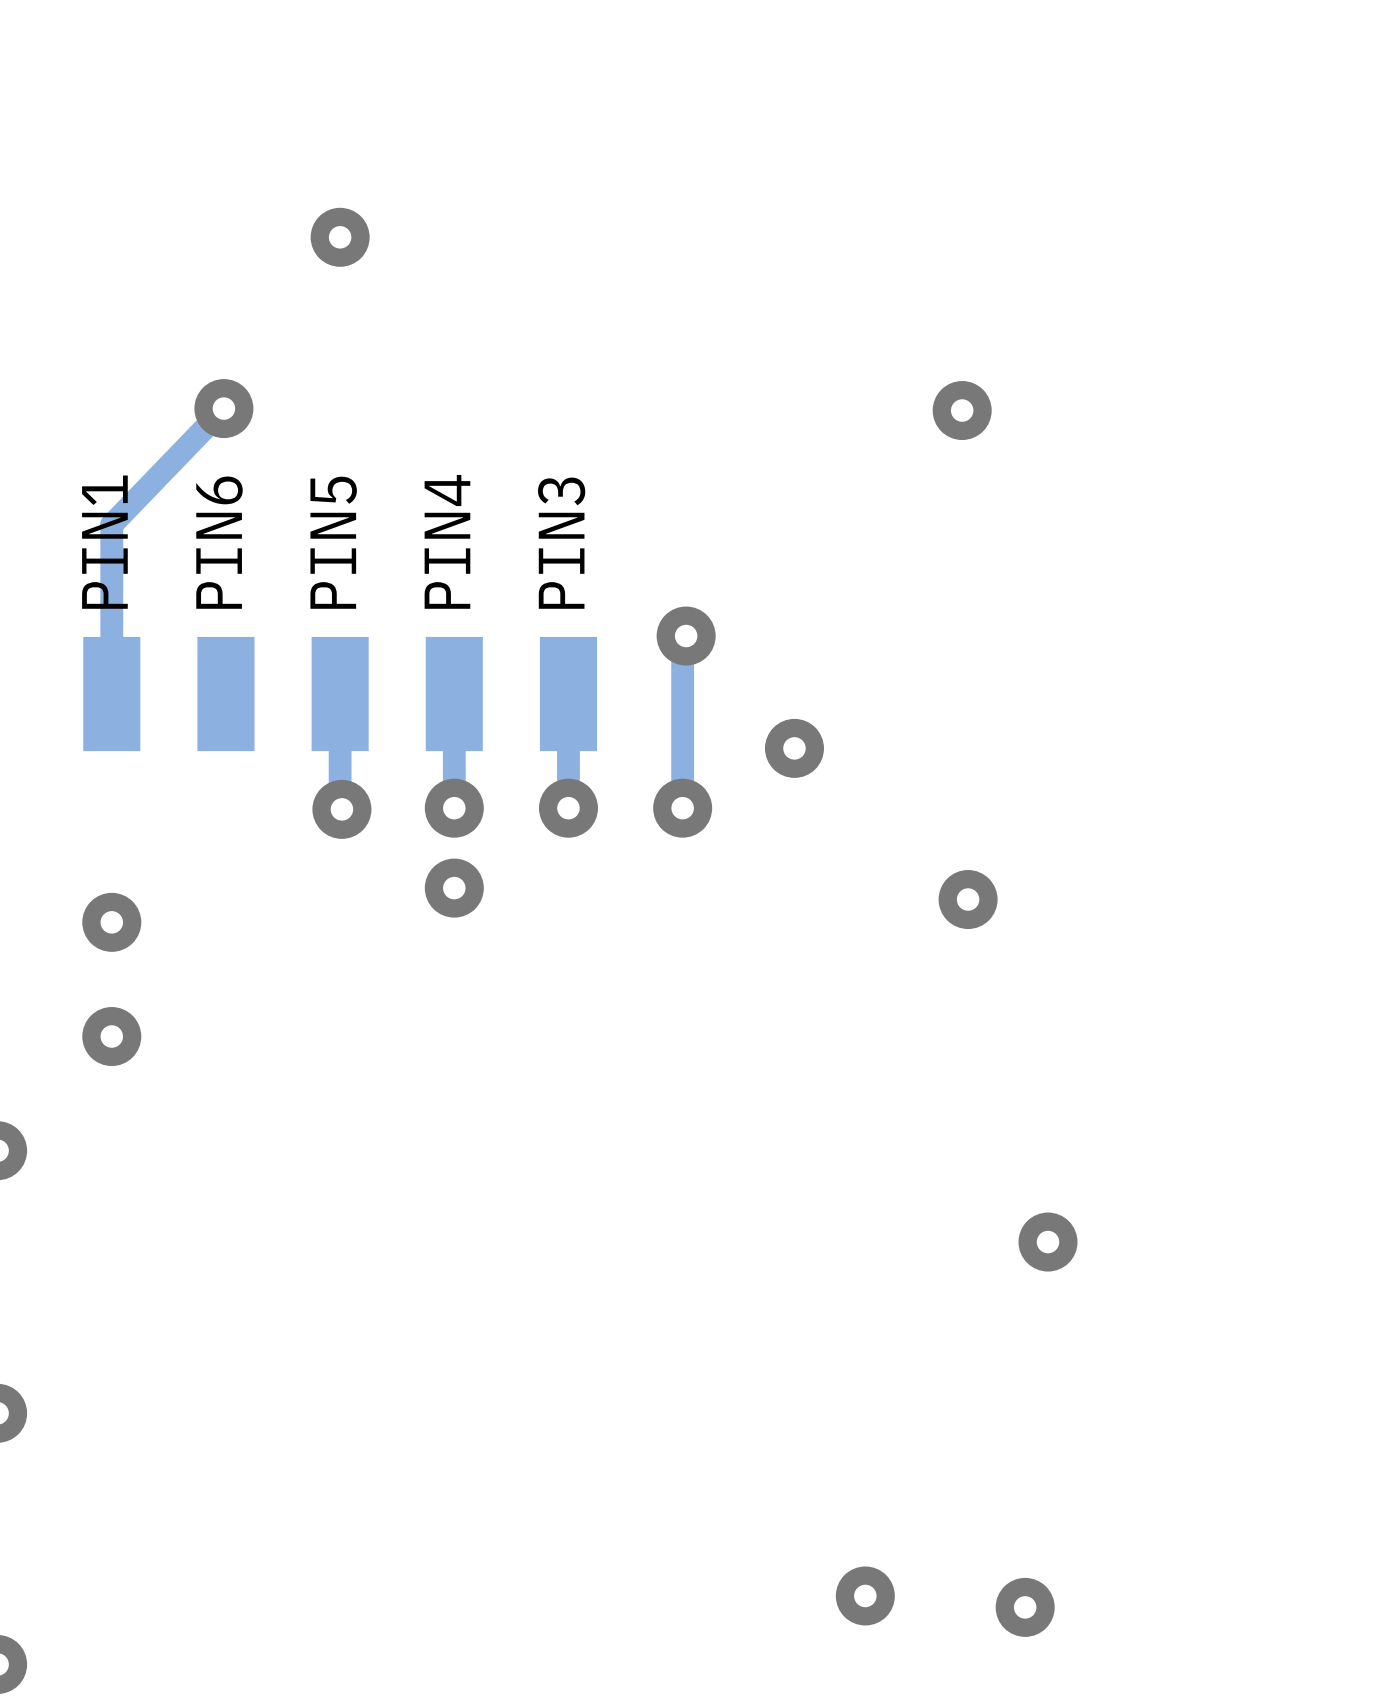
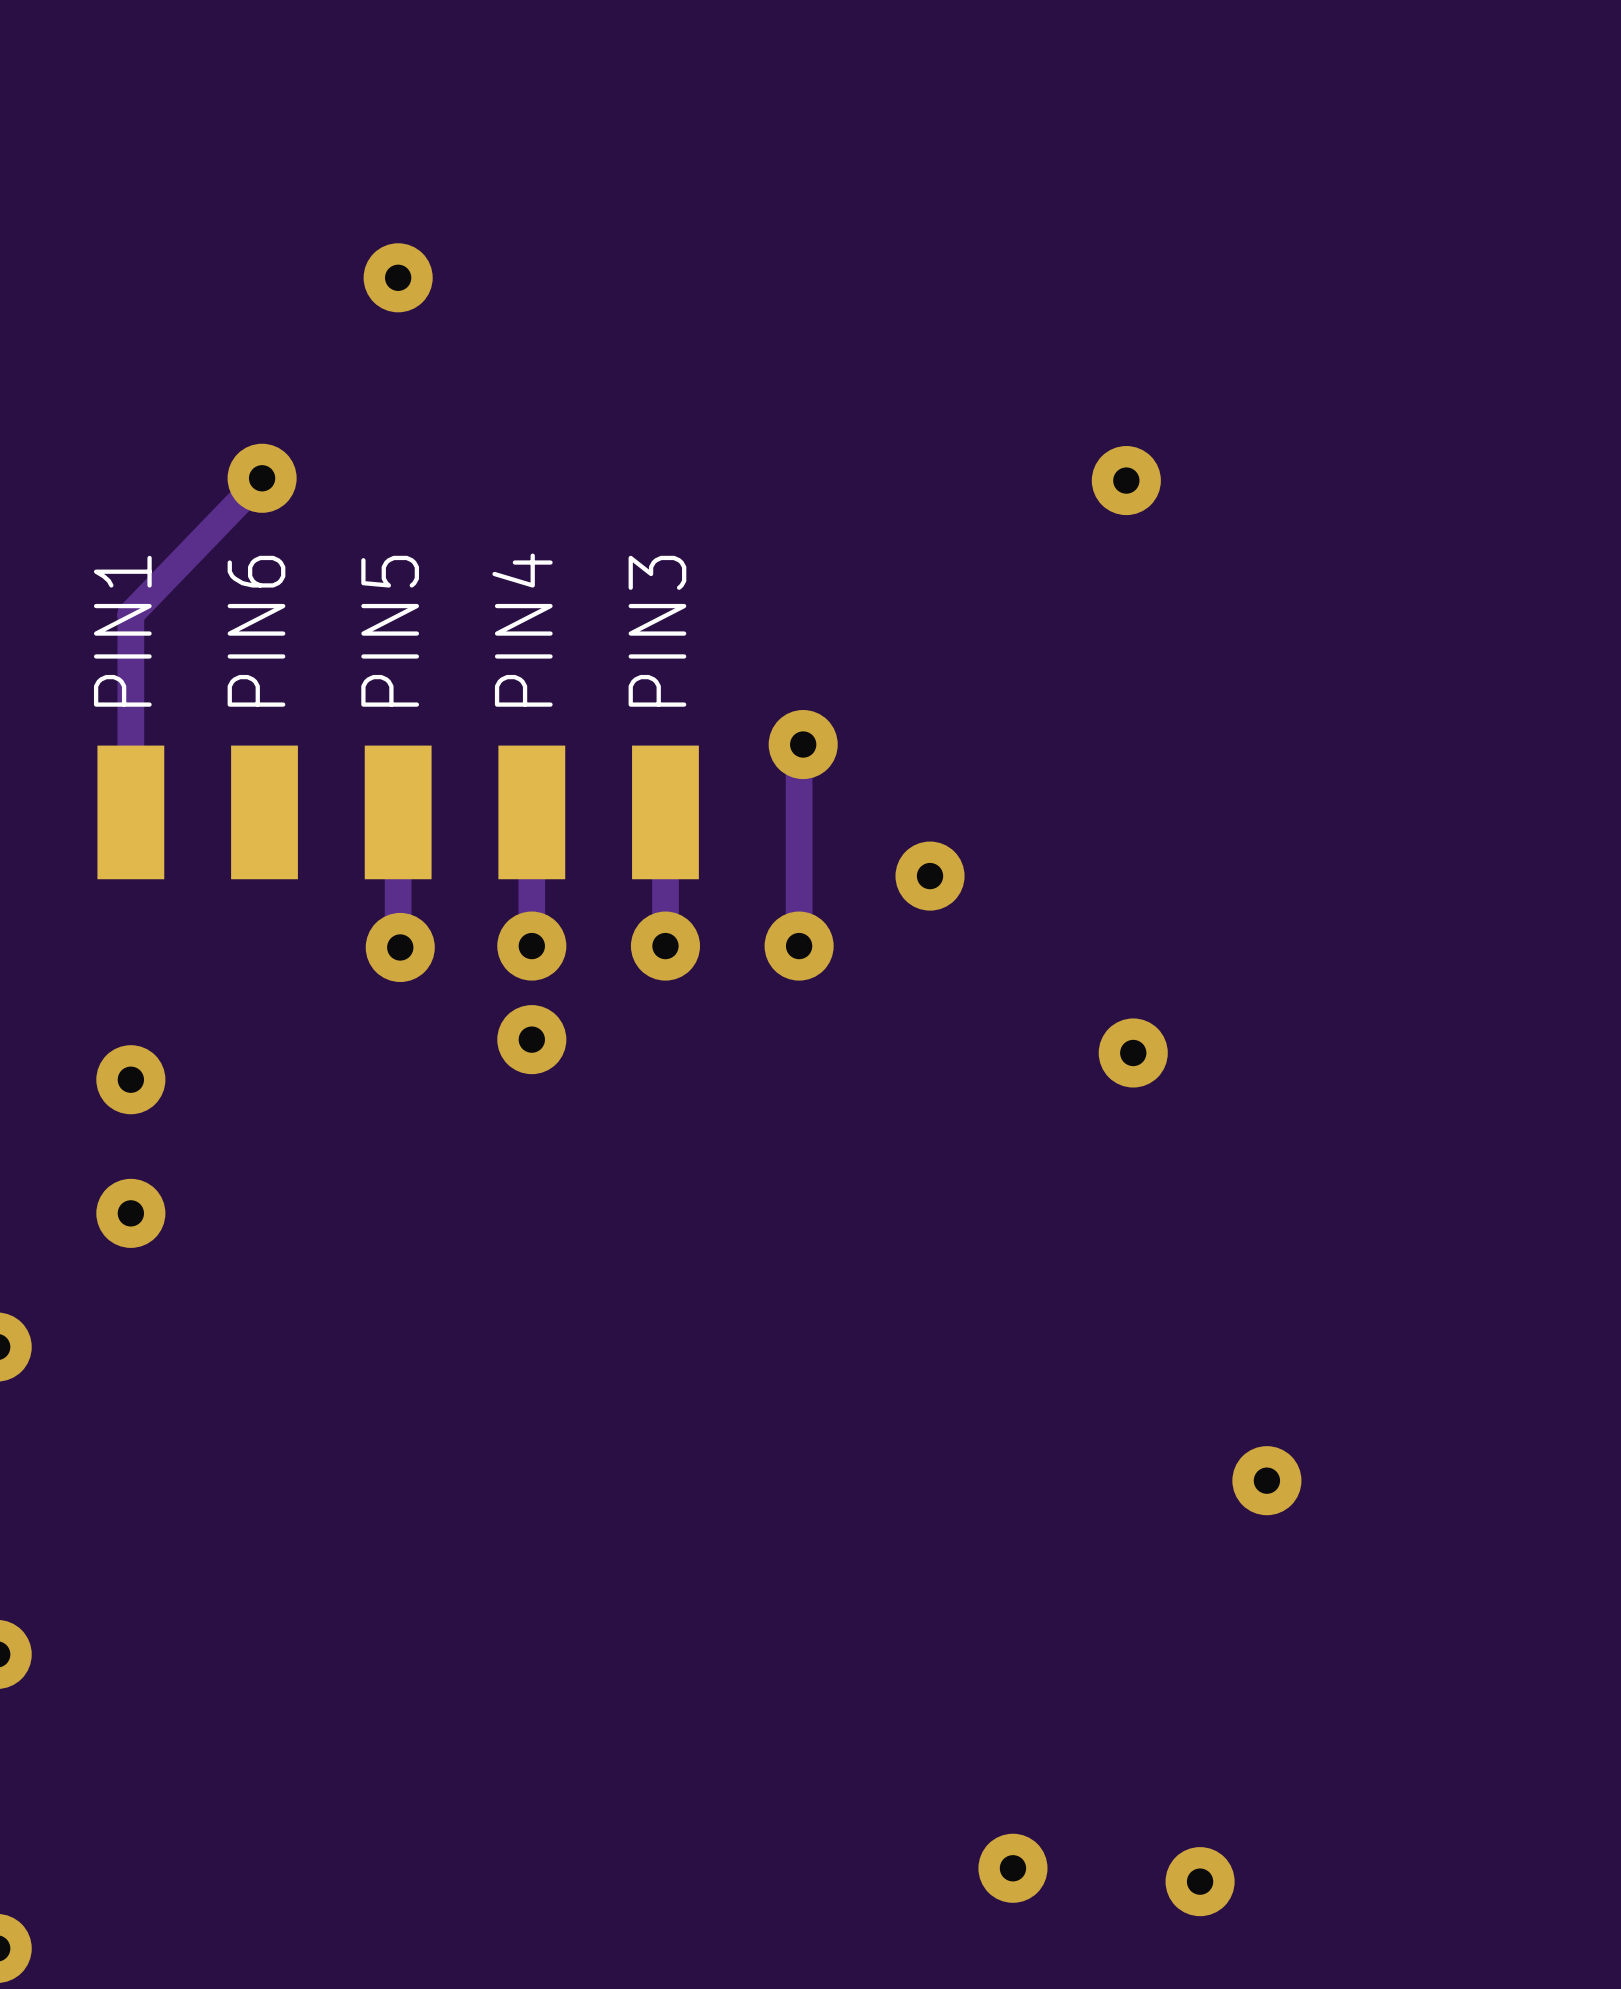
via position: (1048, 1242) -> (1266, 1480)

